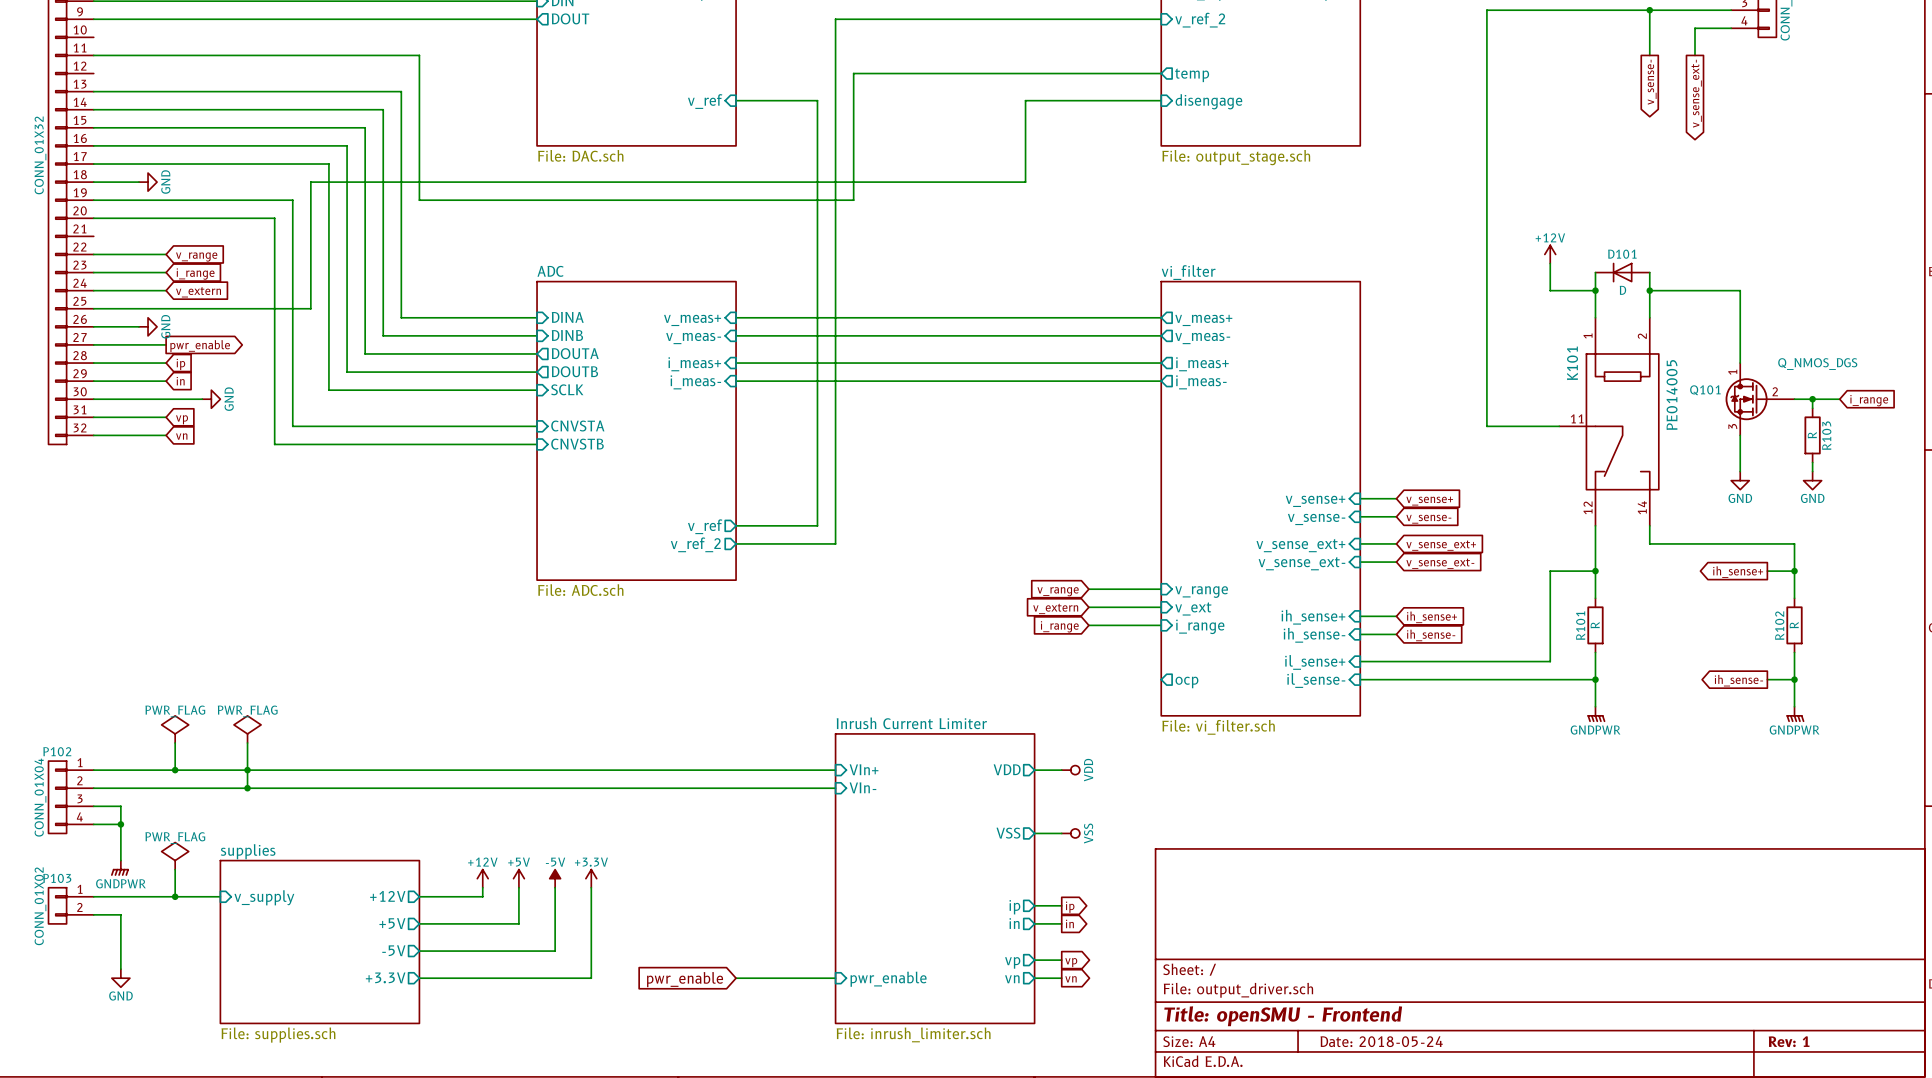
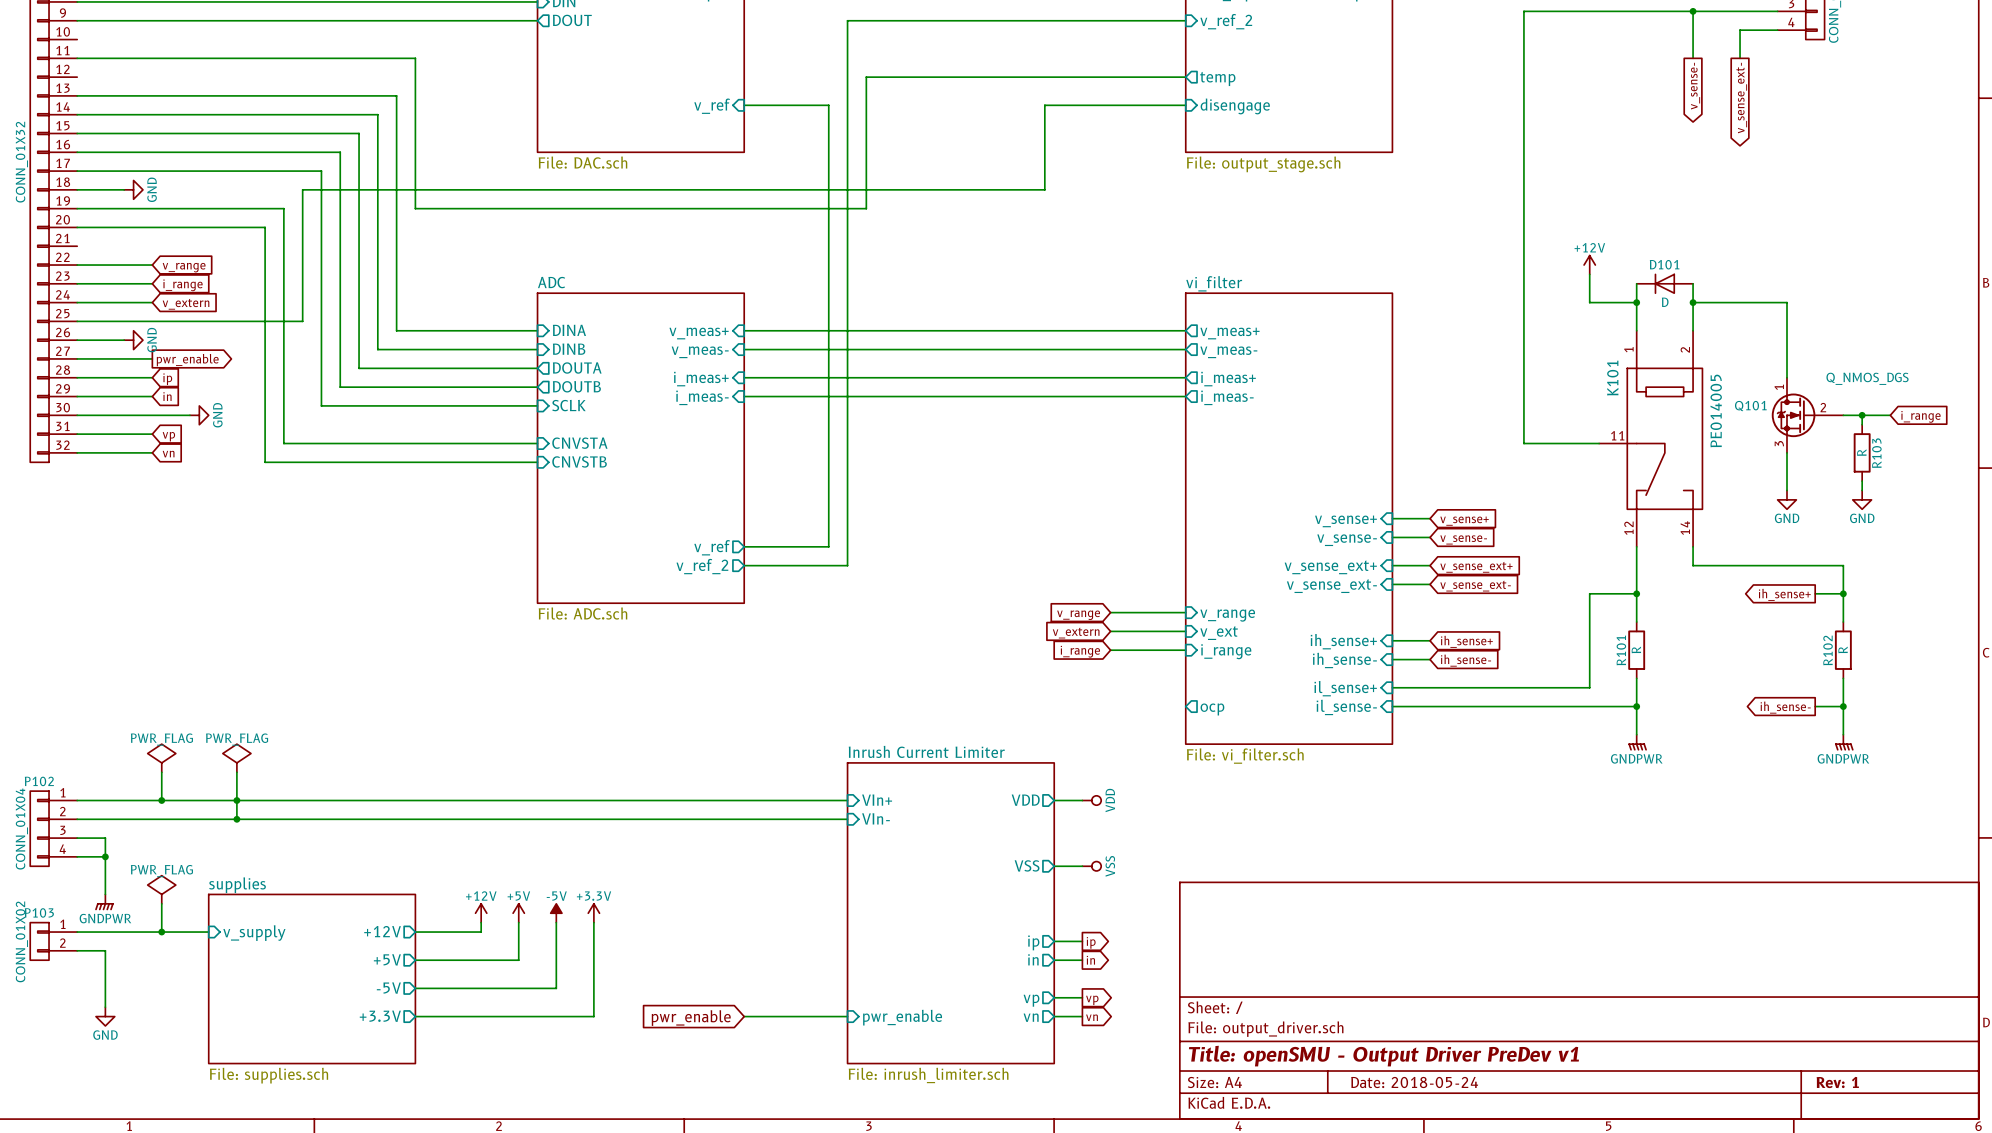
title block: Title: openSMU - Frontend (1283, 1016) -> Title: openSMU - Output Driver PreDev v1 (1383, 1056)

